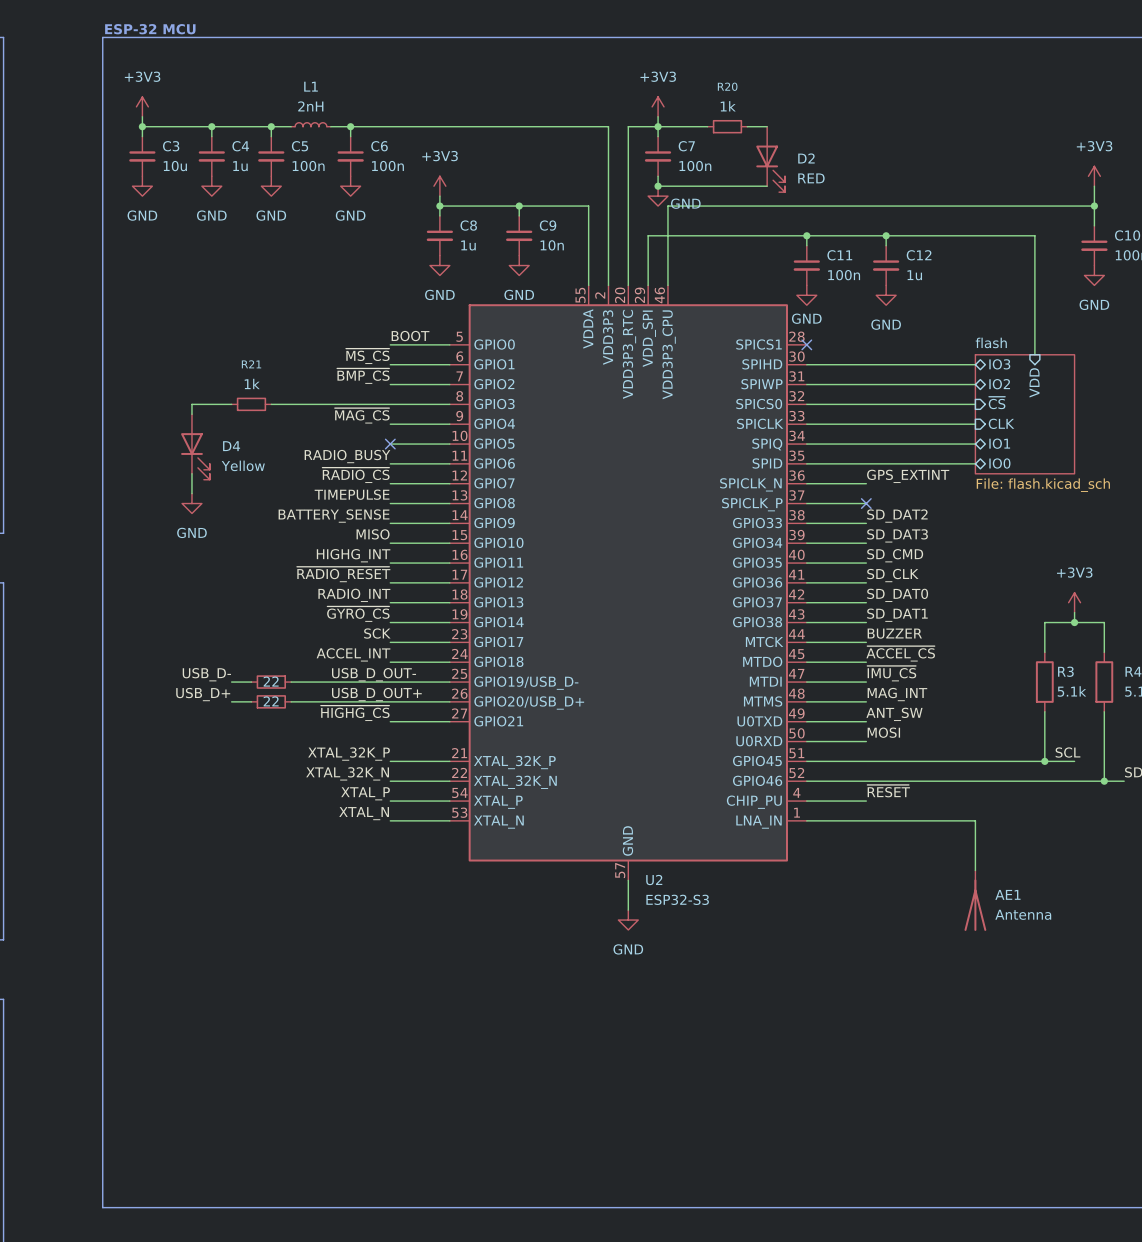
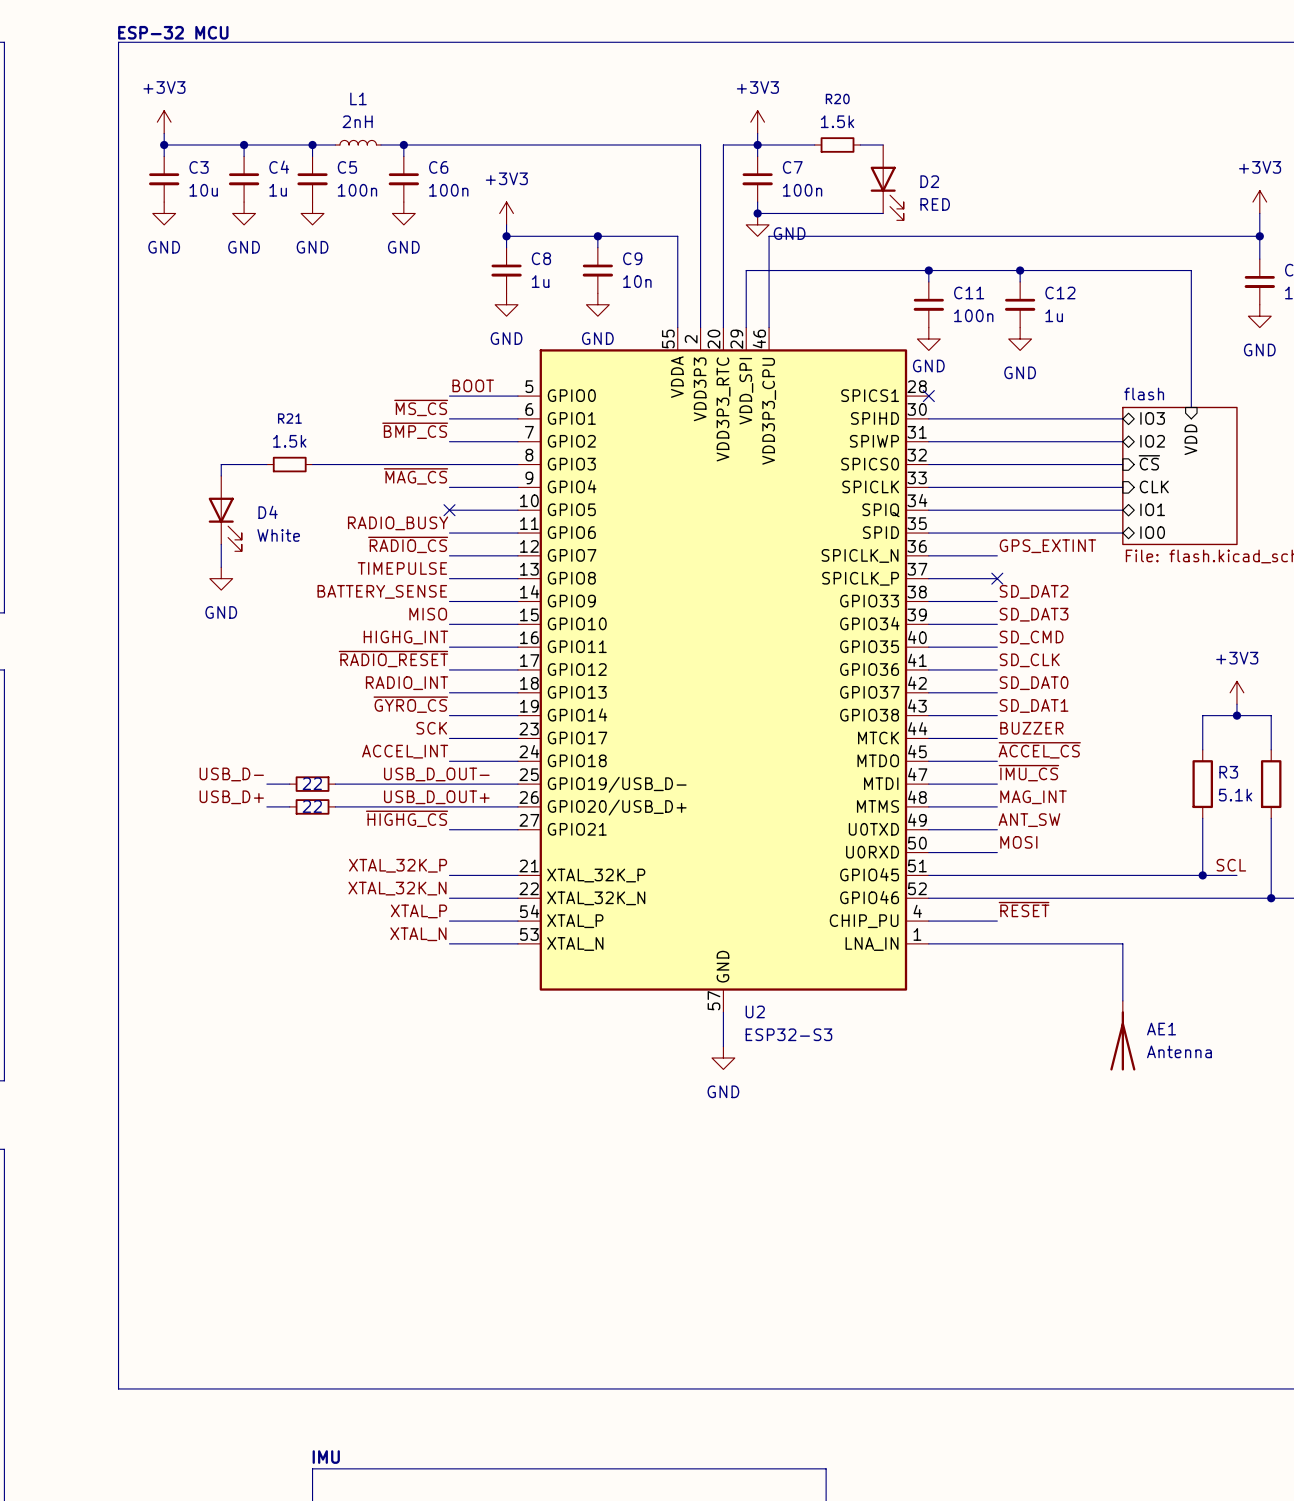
R20 value: 1k (728, 106) -> 1.5k (837, 121)
R21 value: 1k (252, 383) -> 1.5k (289, 441)
D4 value: Yellow (243, 465) -> White (278, 535)

